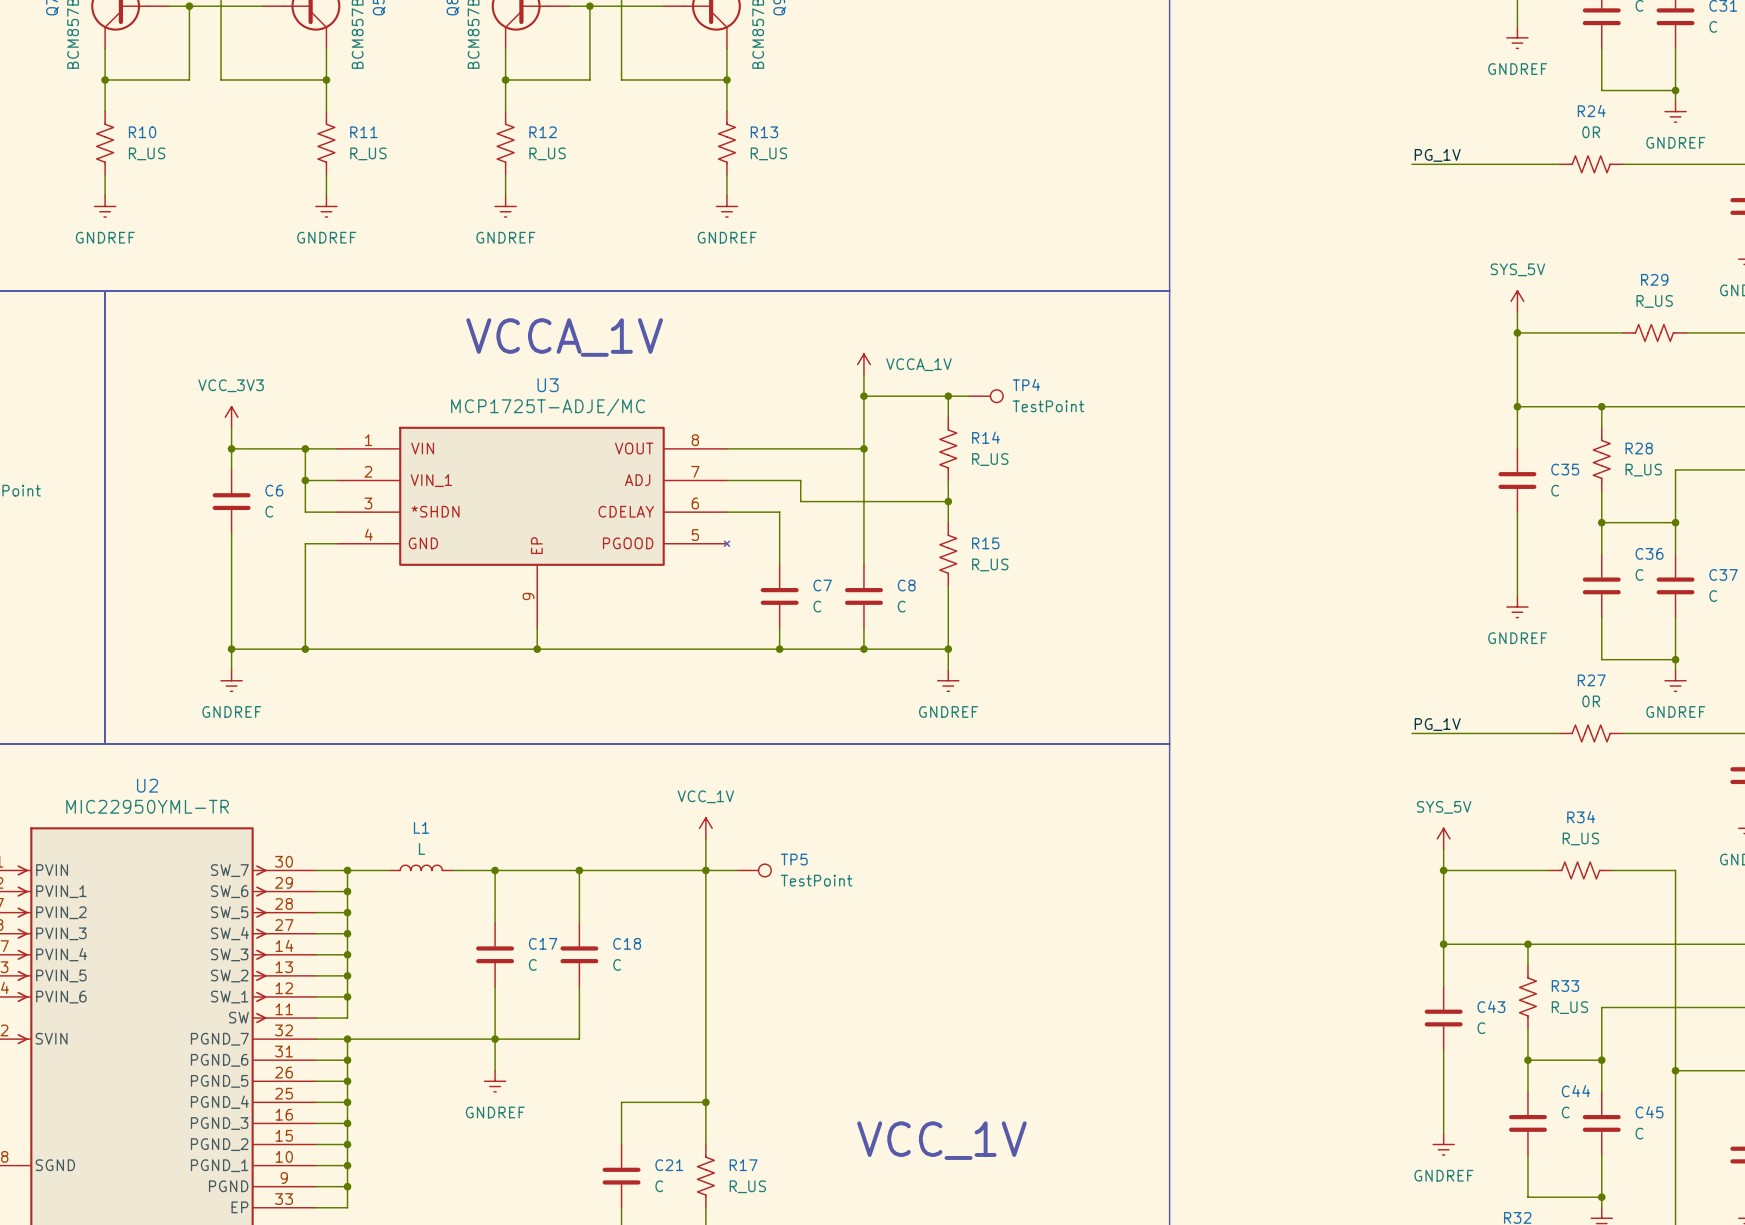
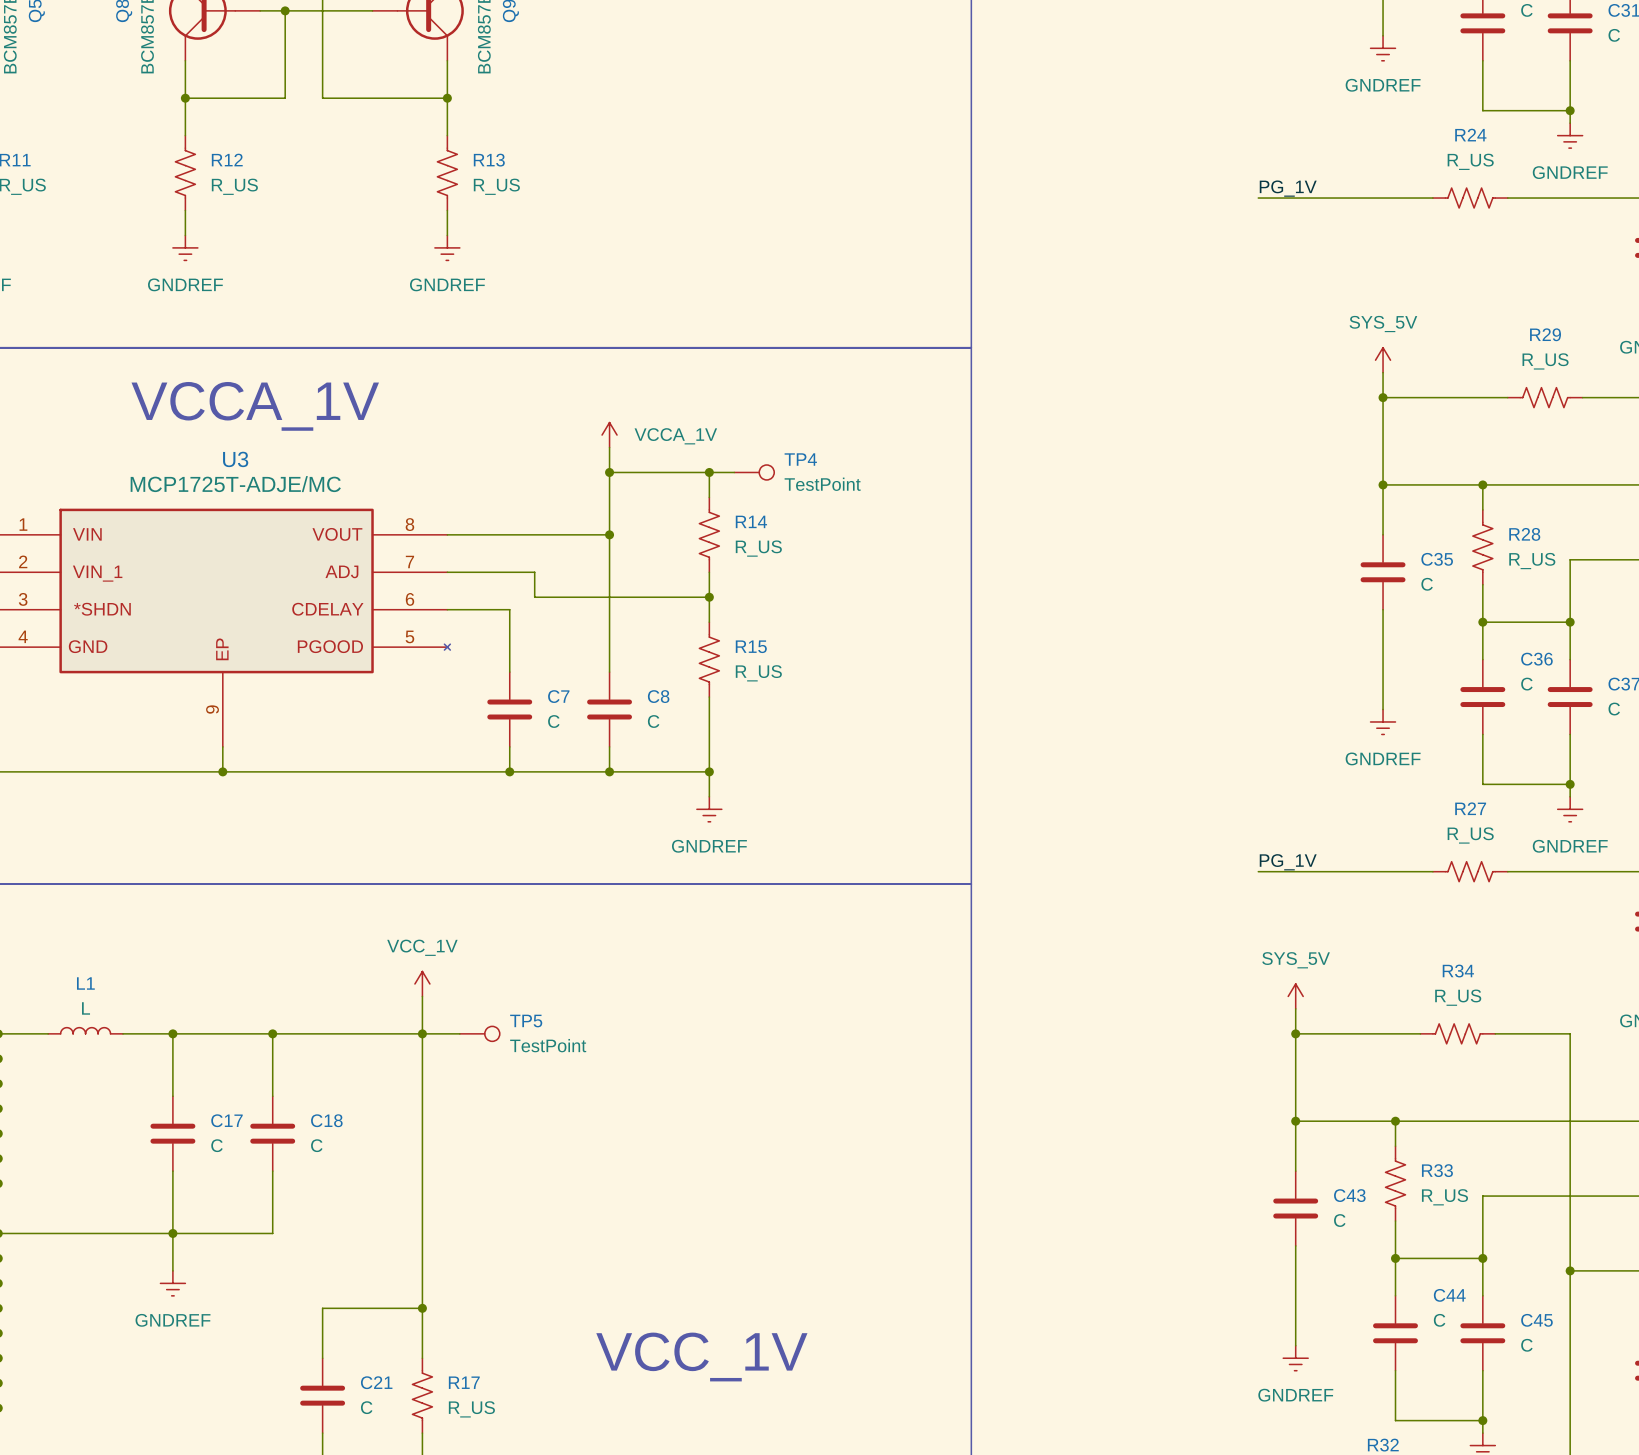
R24 value: 0R (1591, 132) -> R_US (1470, 161)
R27 value: 0R (1591, 701) -> R_US (1470, 835)

